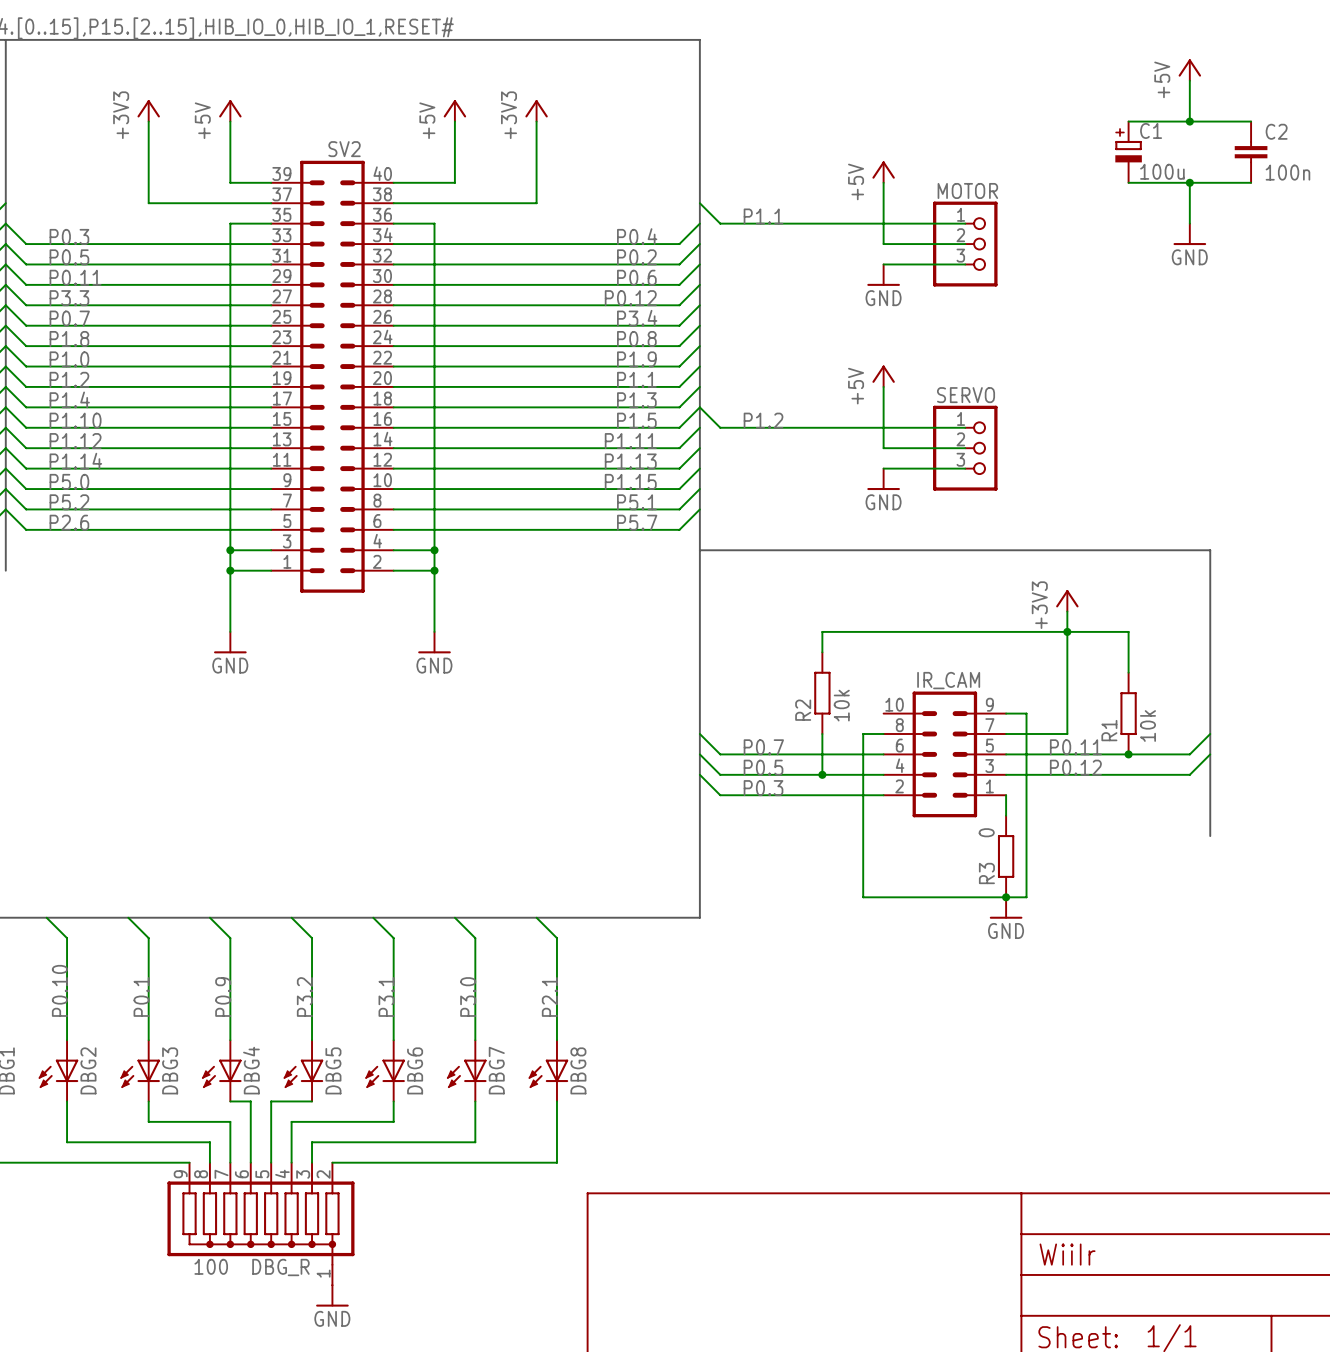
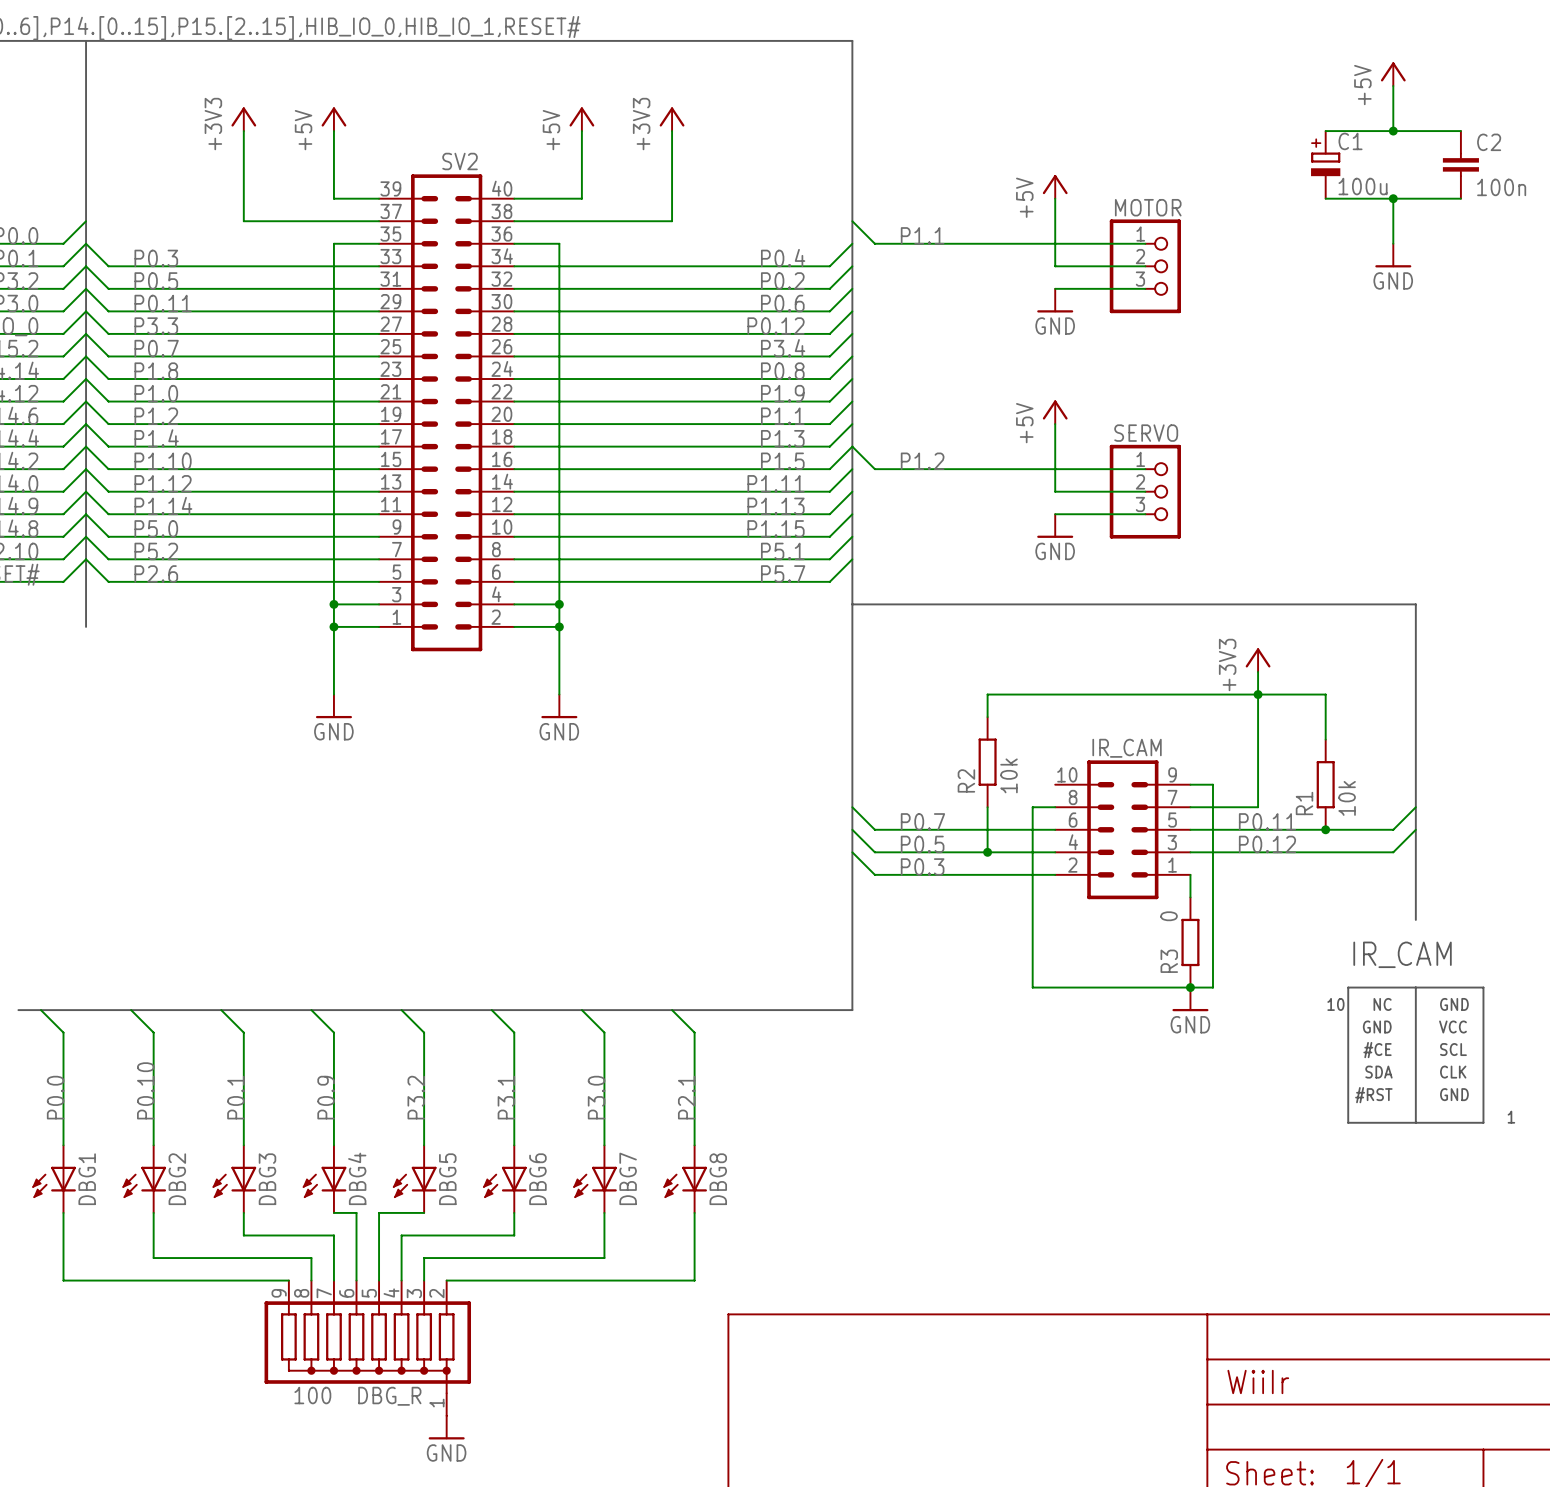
text: none -> IR_CAM (1402, 954)
line: none -> (1348, 987) (1483, 987) (1483, 1122) (1348, 1122) (1348, 987)
line: none -> (1415, 987) (1415, 1122)
text: none -> 10 (1335, 1004)
text: none -> NC (1382, 1004)
text: none -> GND (1454, 1004)
text: none -> GND (1377, 1027)
text: none -> VCC (1452, 1027)
text: none -> #CE (1377, 1050)
text: none -> SCL (1453, 1049)
text: none -> SDA (1378, 1072)
text: none -> CLK (1453, 1072)
text: none -> #RST (1373, 1095)
text: none -> GND (1454, 1094)
text: none -> 1 (1511, 1117)

